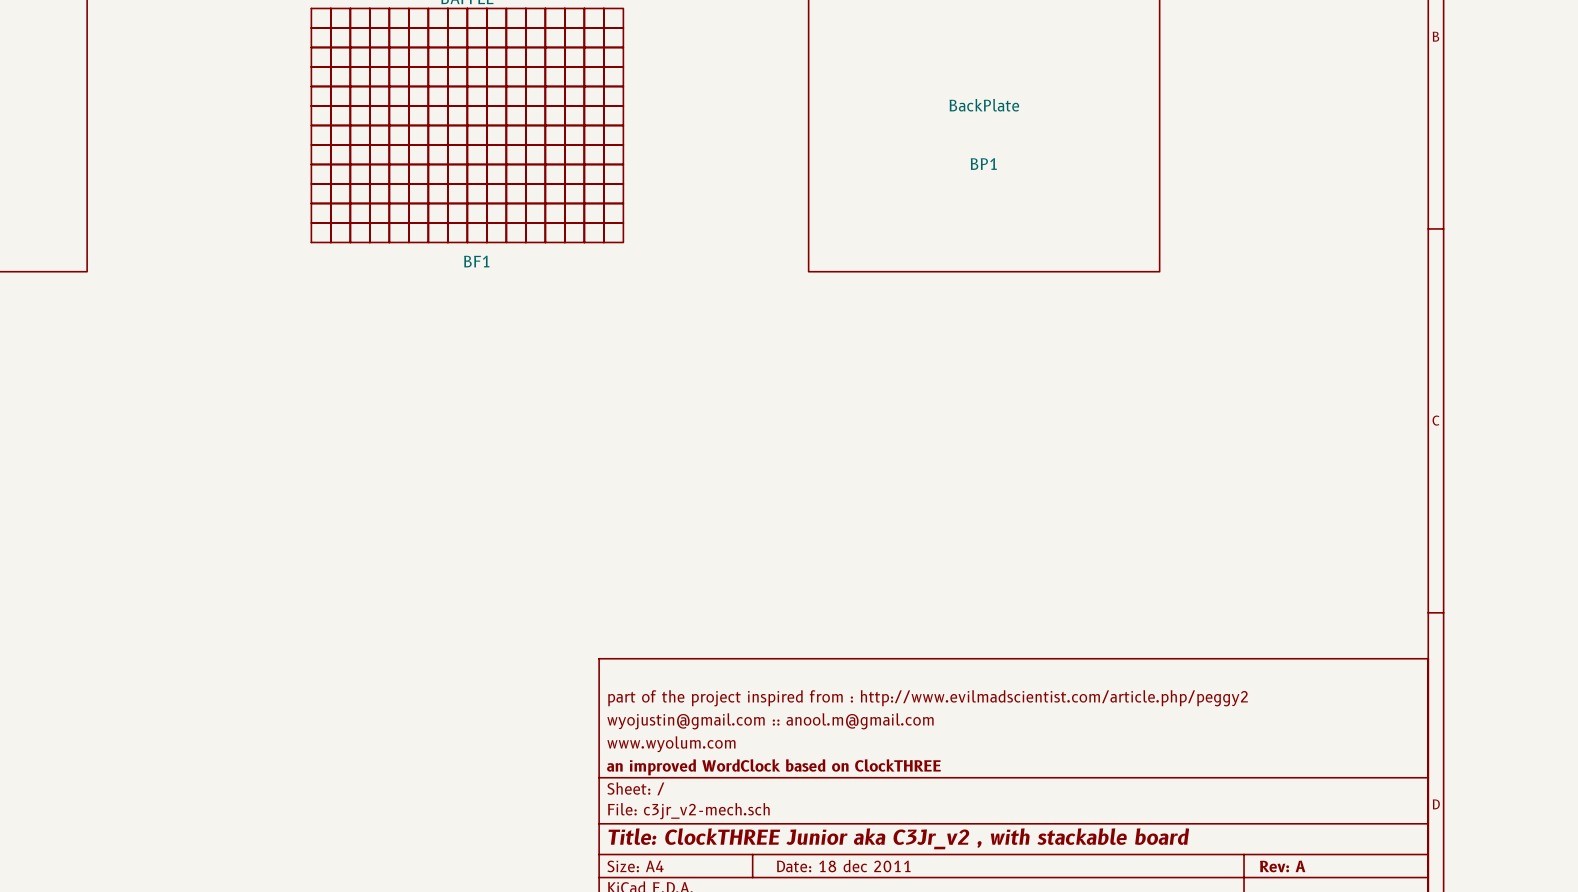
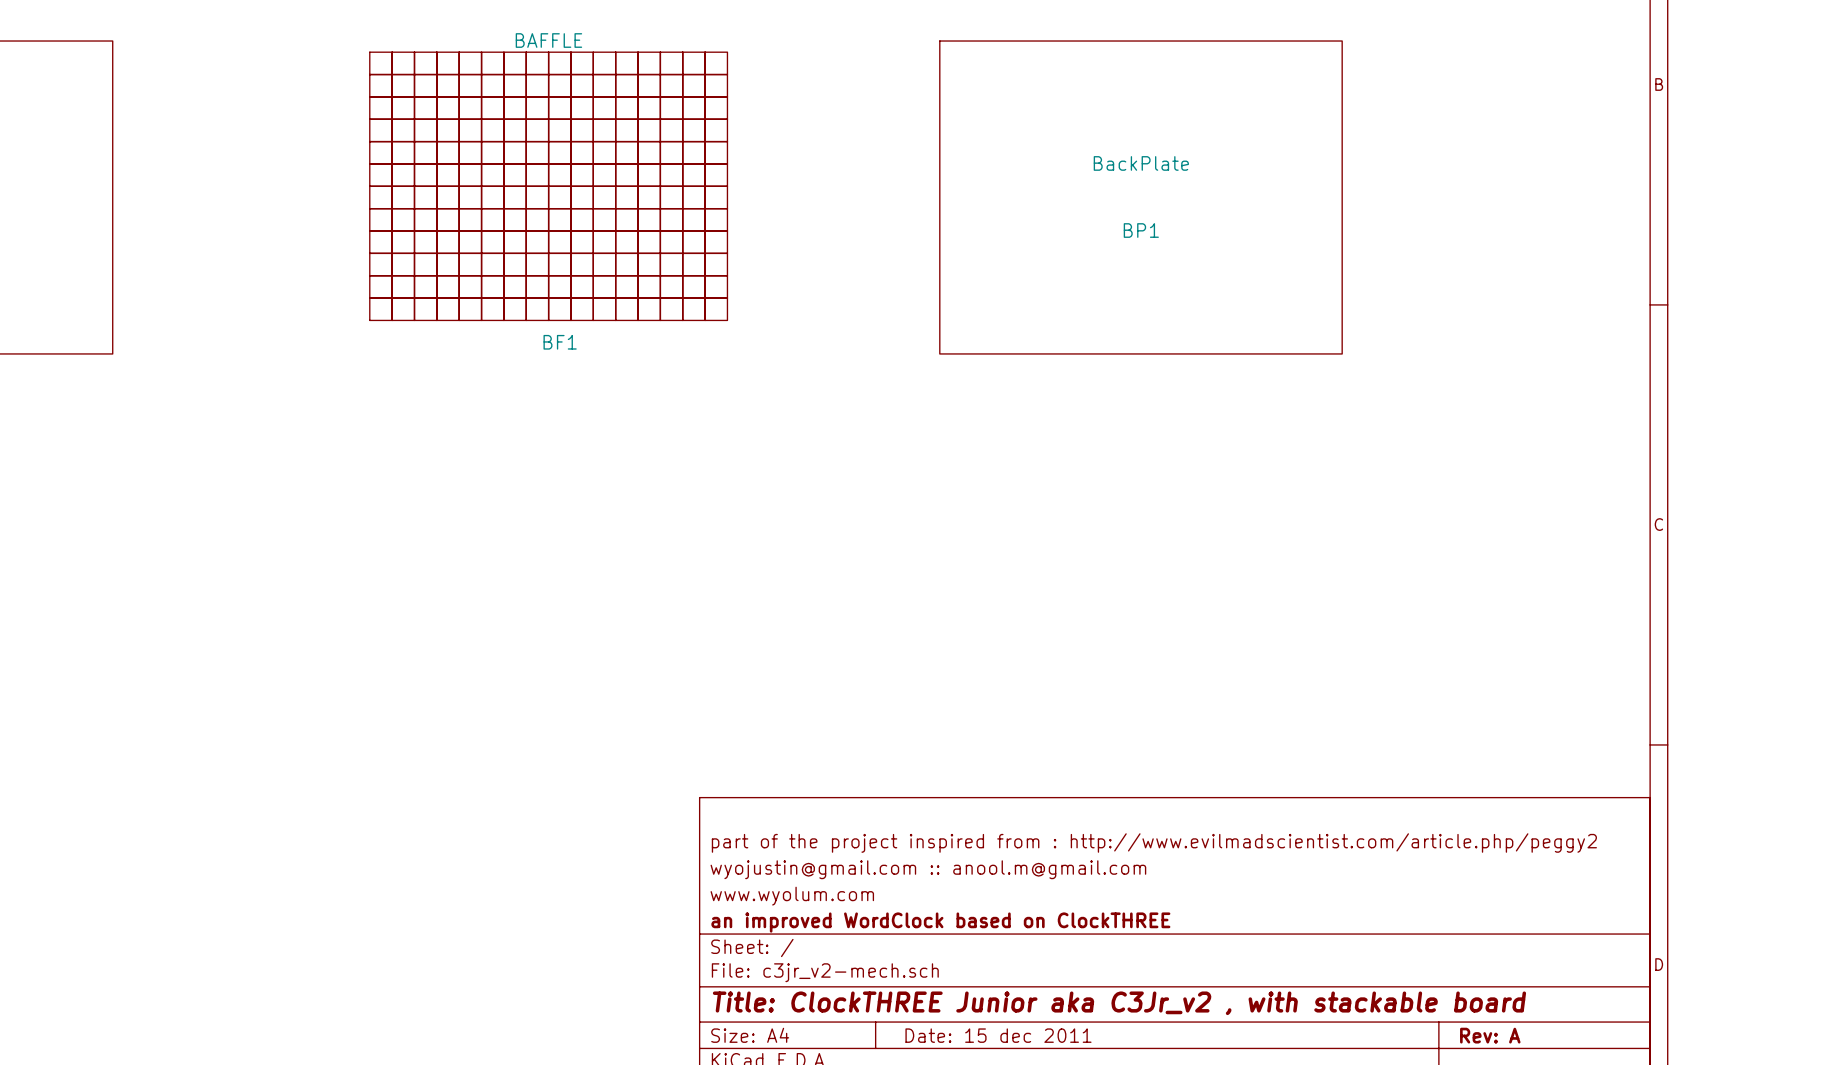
title block: Date: 18 dec 2011 (843, 866) -> Date: 15 dec 2011 (998, 1035)

